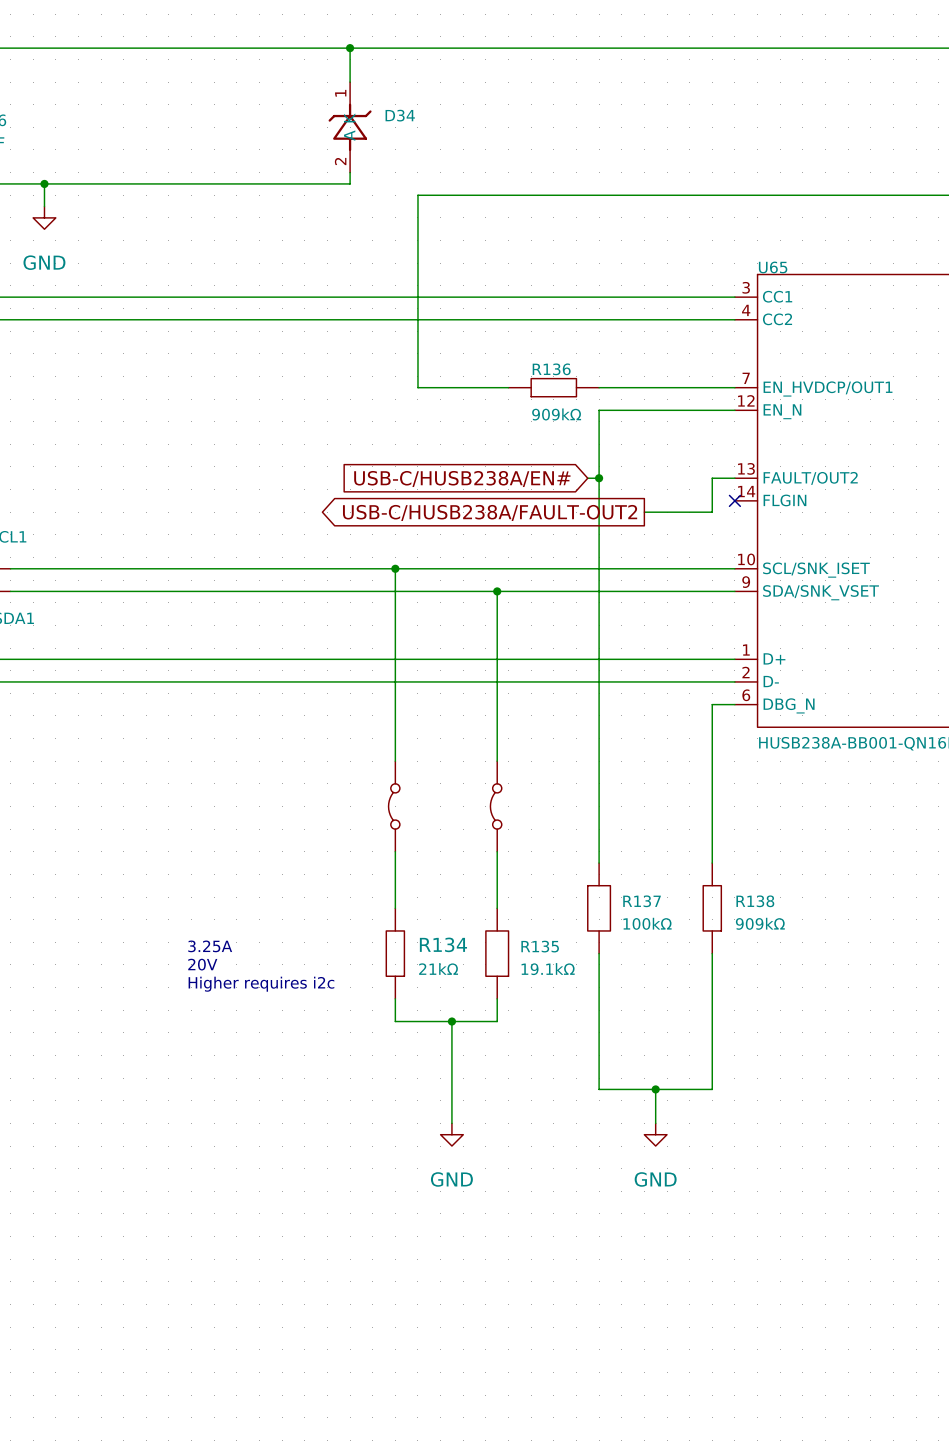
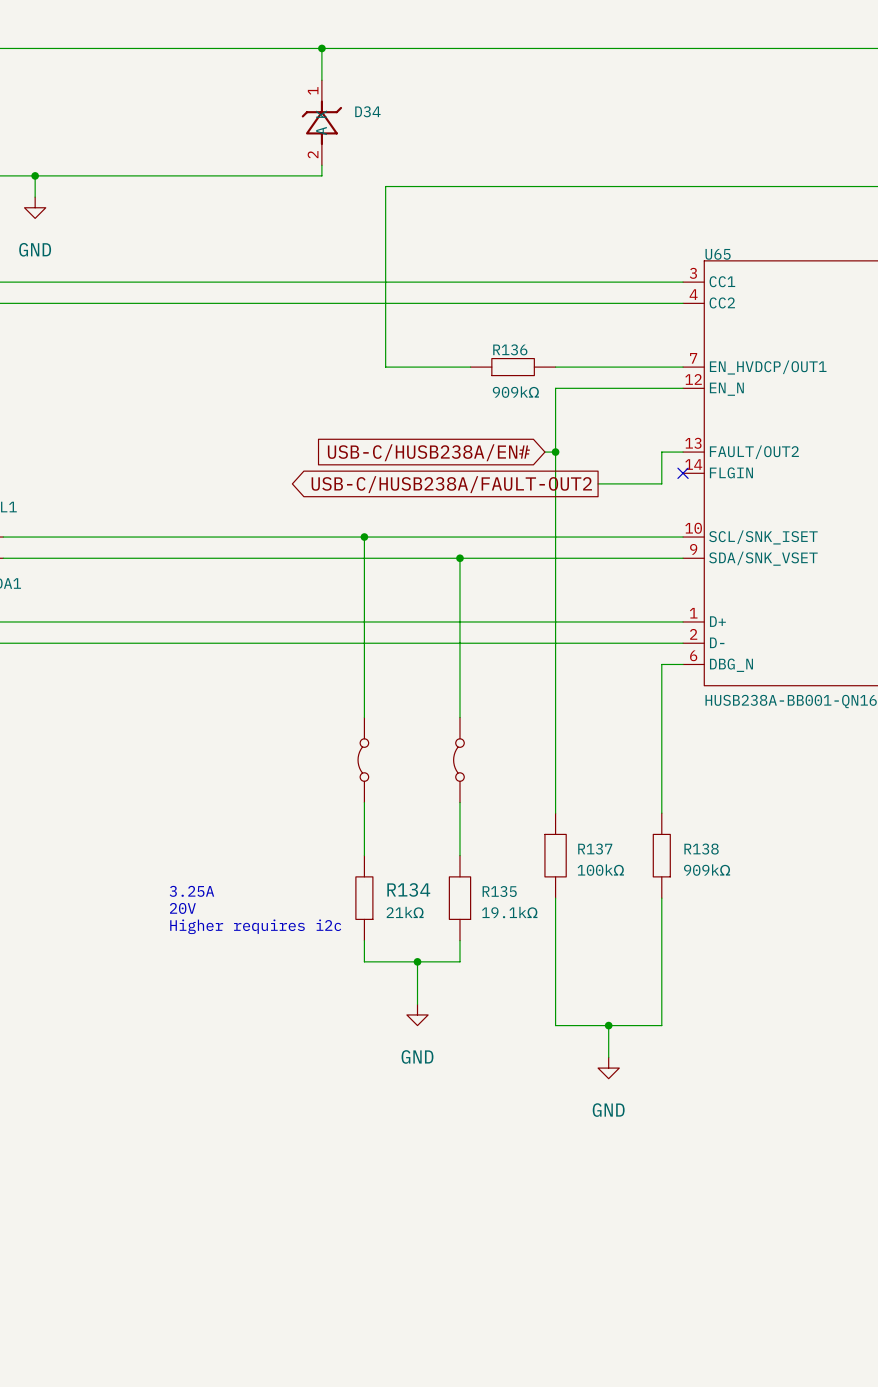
wire: (451, 1066) (451, 1123) -> none
power symbol position: GND (451, 1134) -> GND (417, 1014)

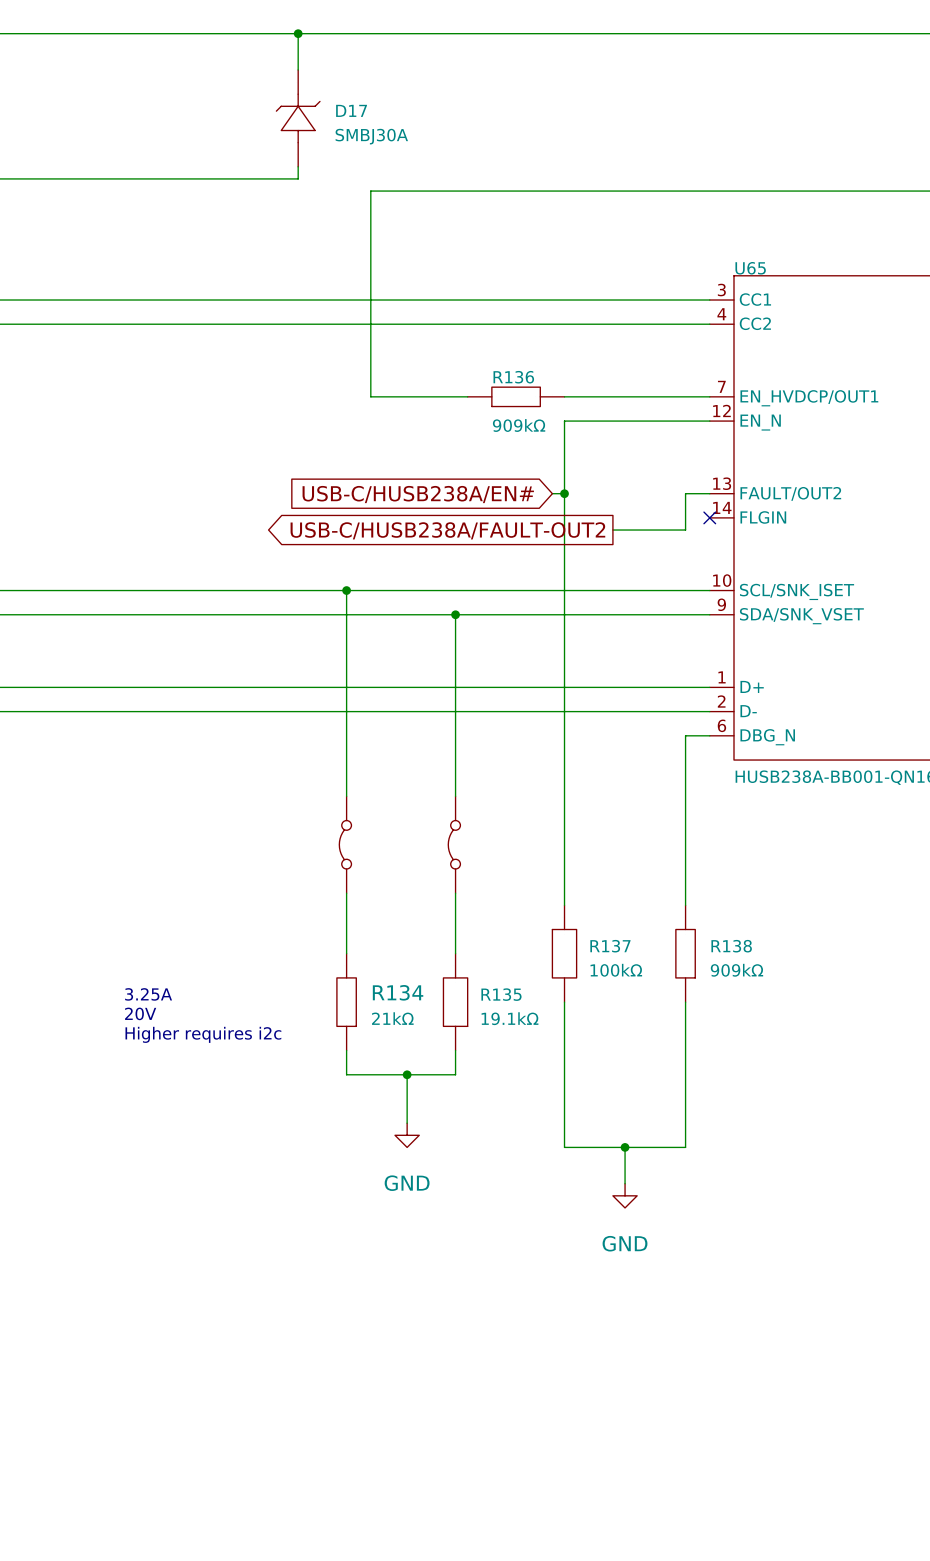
D34: (321, 122) -> none
D17: none -> SMBJ30A (298, 118)

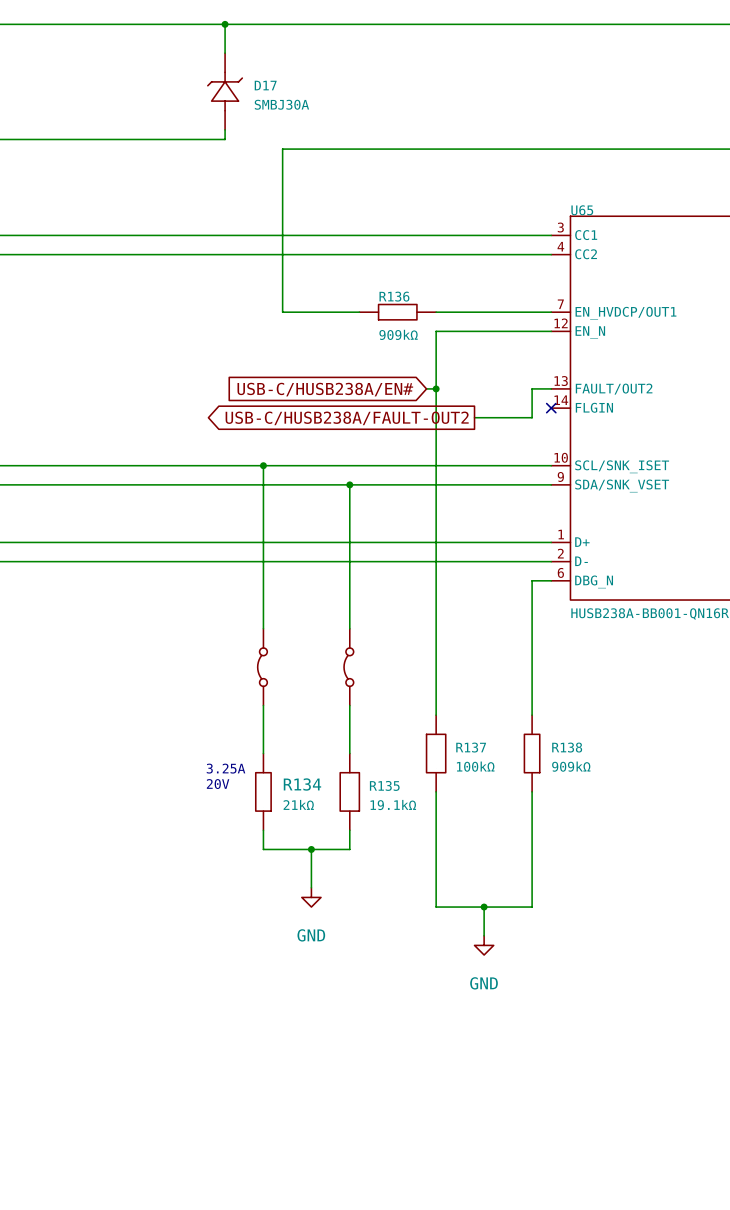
text position: 3.25A (148, 994) -> 3.25A (226, 768)
text position: 20V (140, 1013) -> 20V (218, 784)
text: Higher requires i2c (203, 1034) -> none

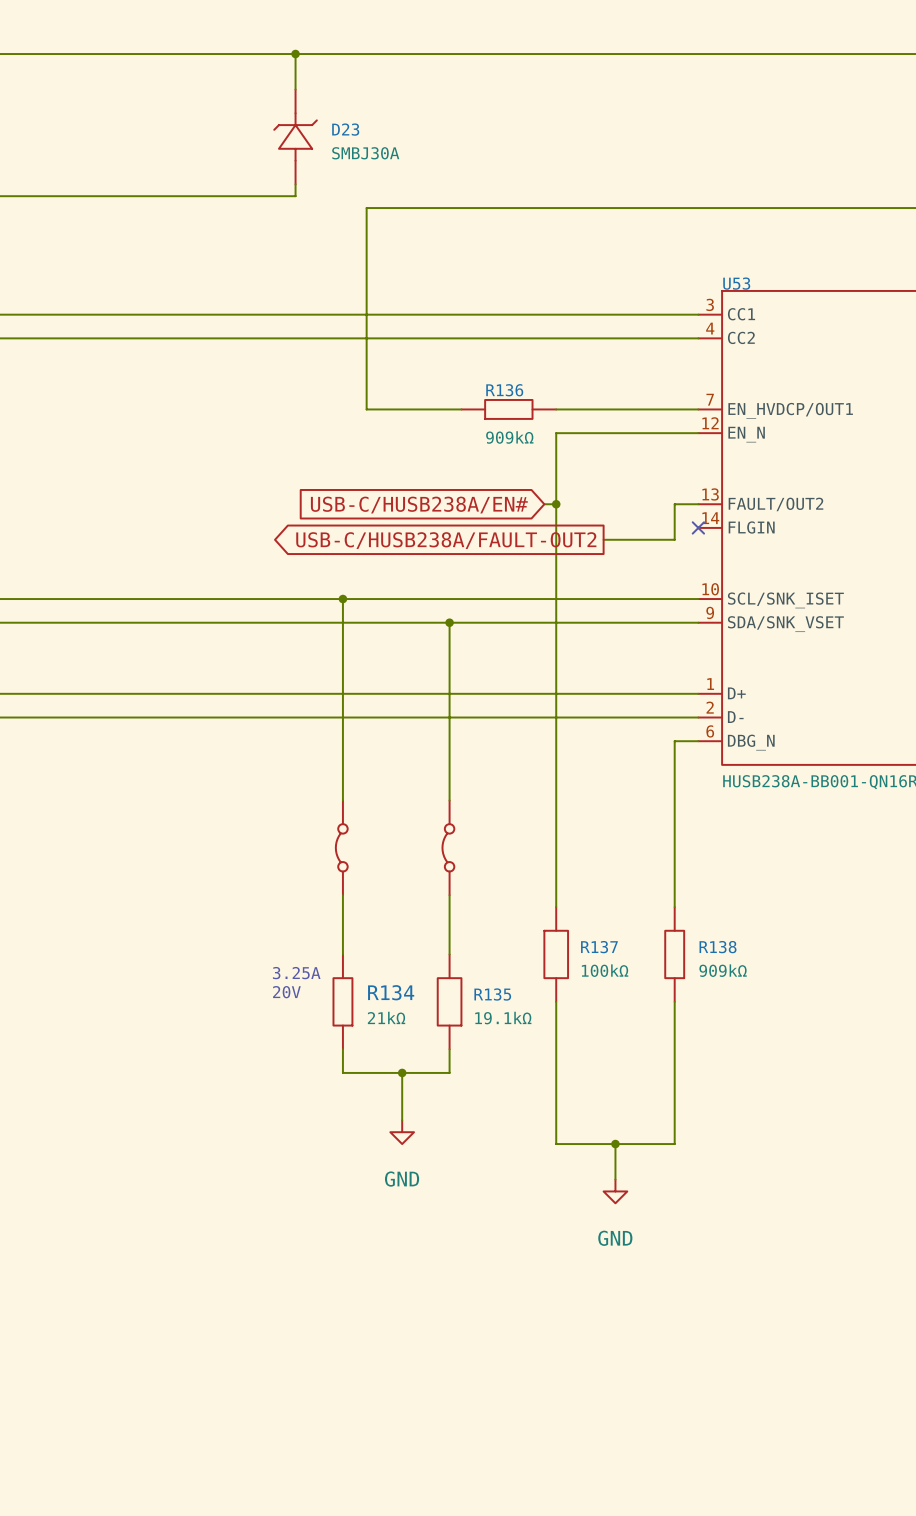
D17 name: D17 (265, 85) -> D23 (345, 129)
U65 name: U65 (582, 210) -> U53 (736, 283)

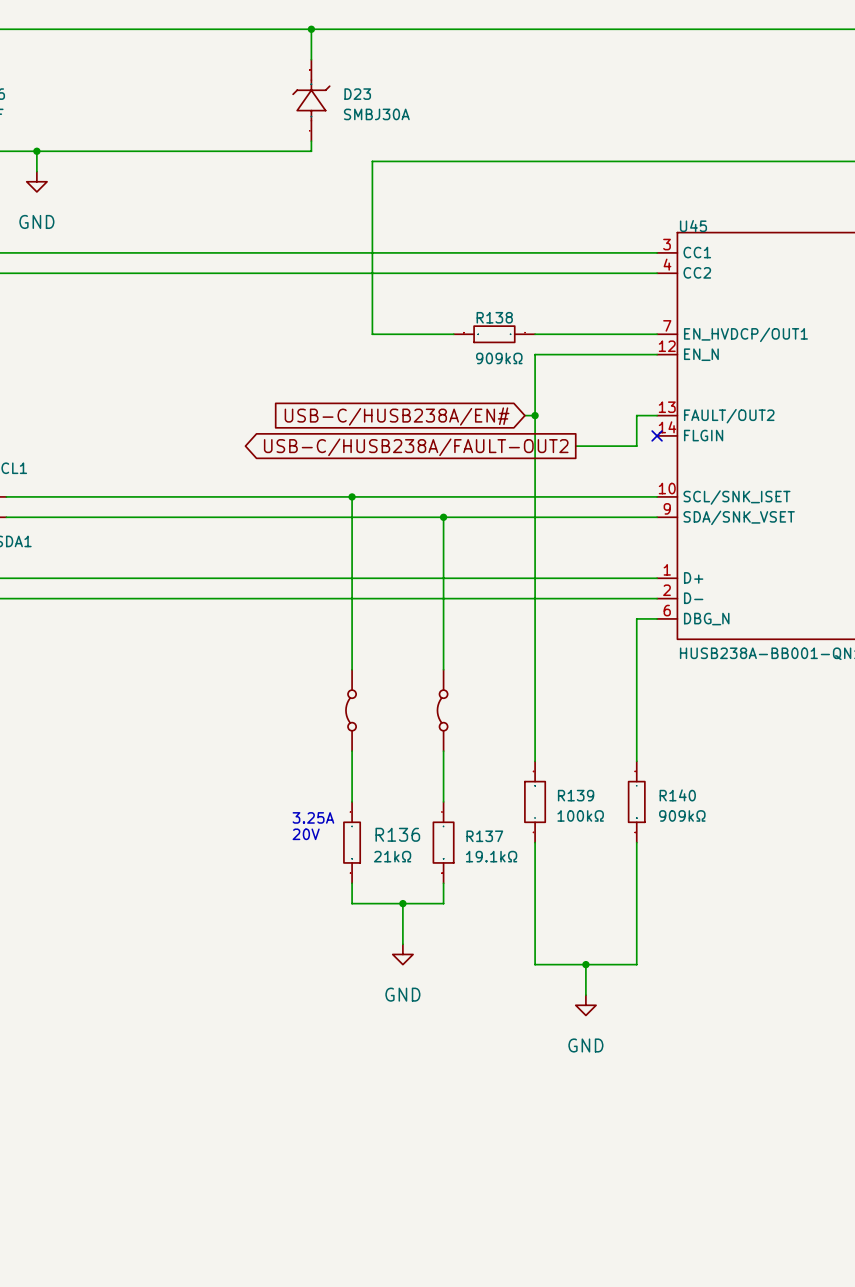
U53 name: U53 (736, 283) -> U45 (693, 226)
R136 name: R136 (504, 390) -> R138 (494, 317)
R137 name: R137 (599, 947) -> R139 (576, 795)
R138 name: R138 (718, 947) -> R140 (677, 795)
R134 name: R134 (391, 992) -> R136 (397, 834)
R135 name: R135 (492, 994) -> R137 (484, 836)

